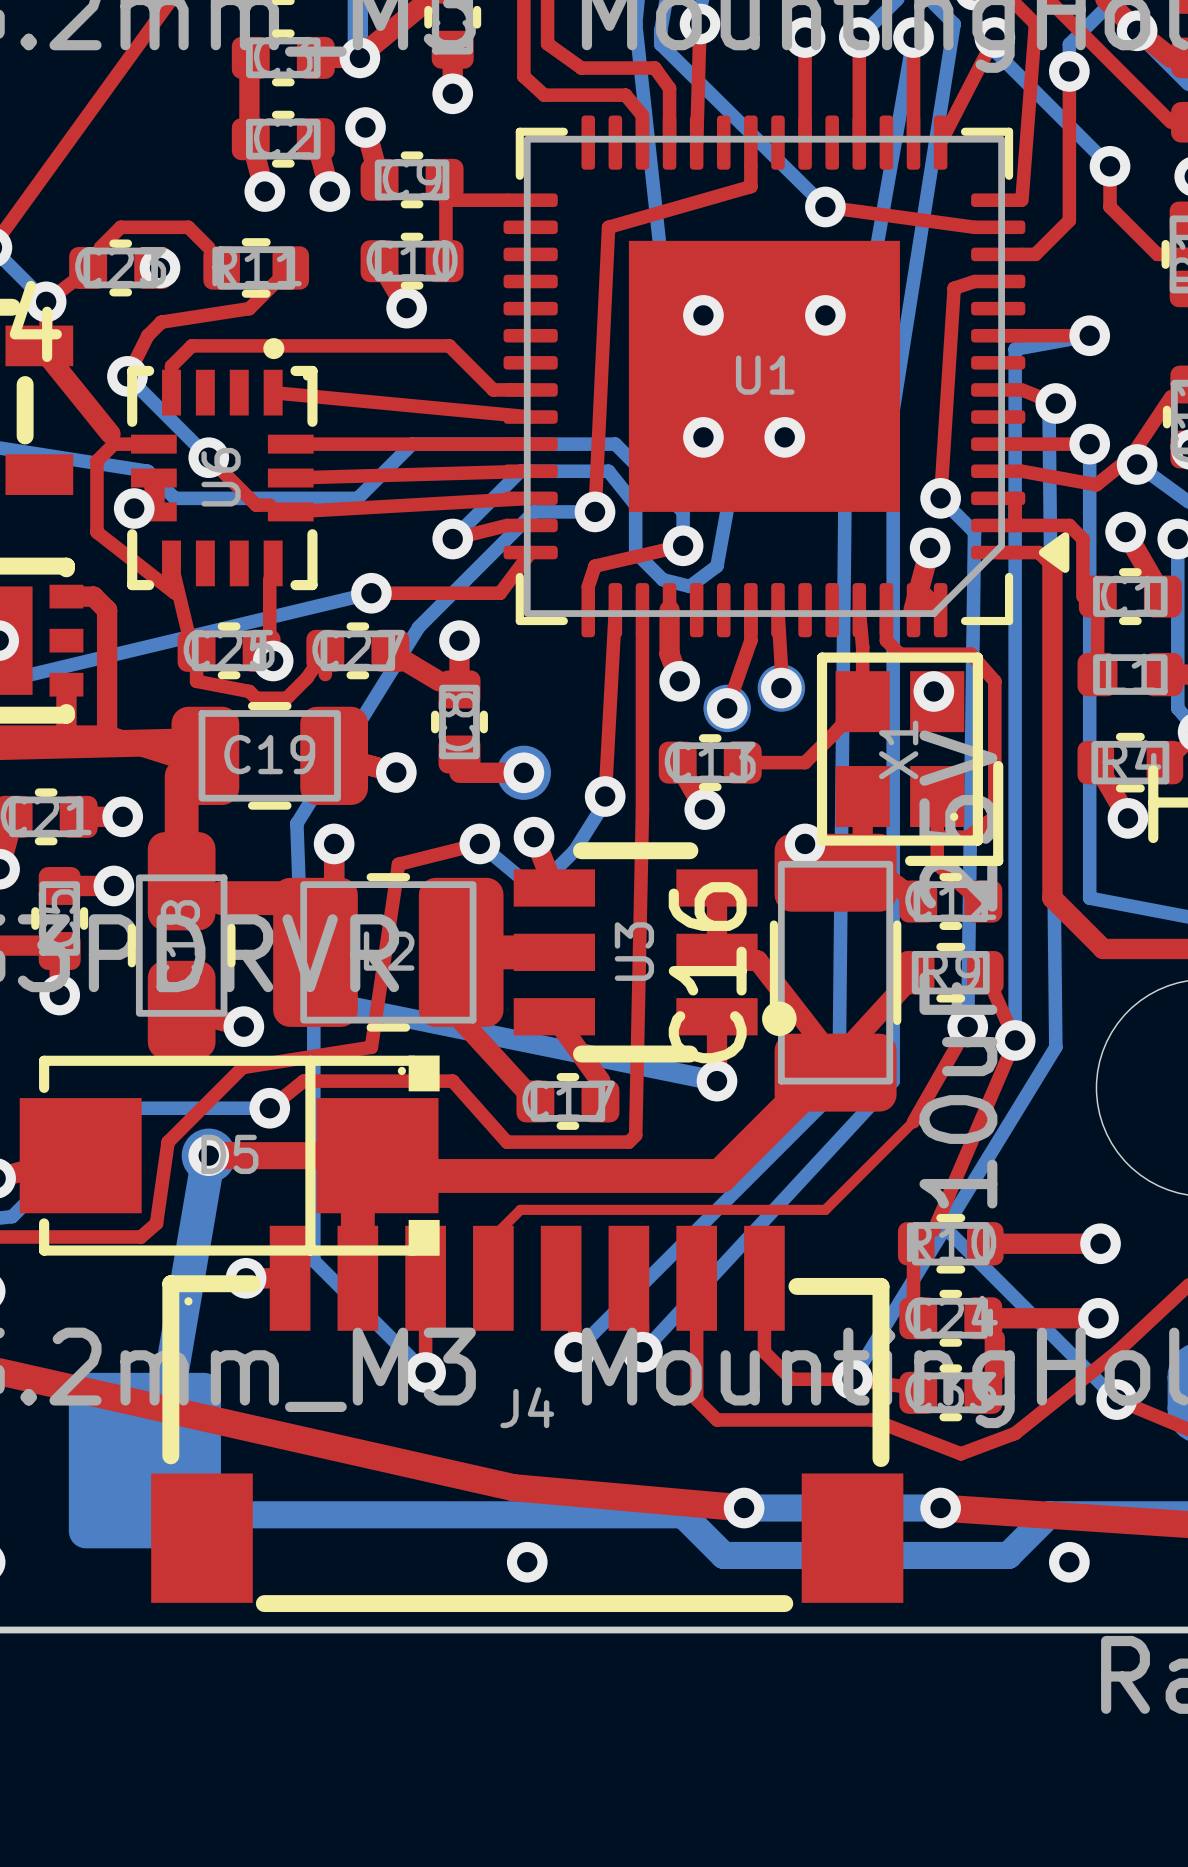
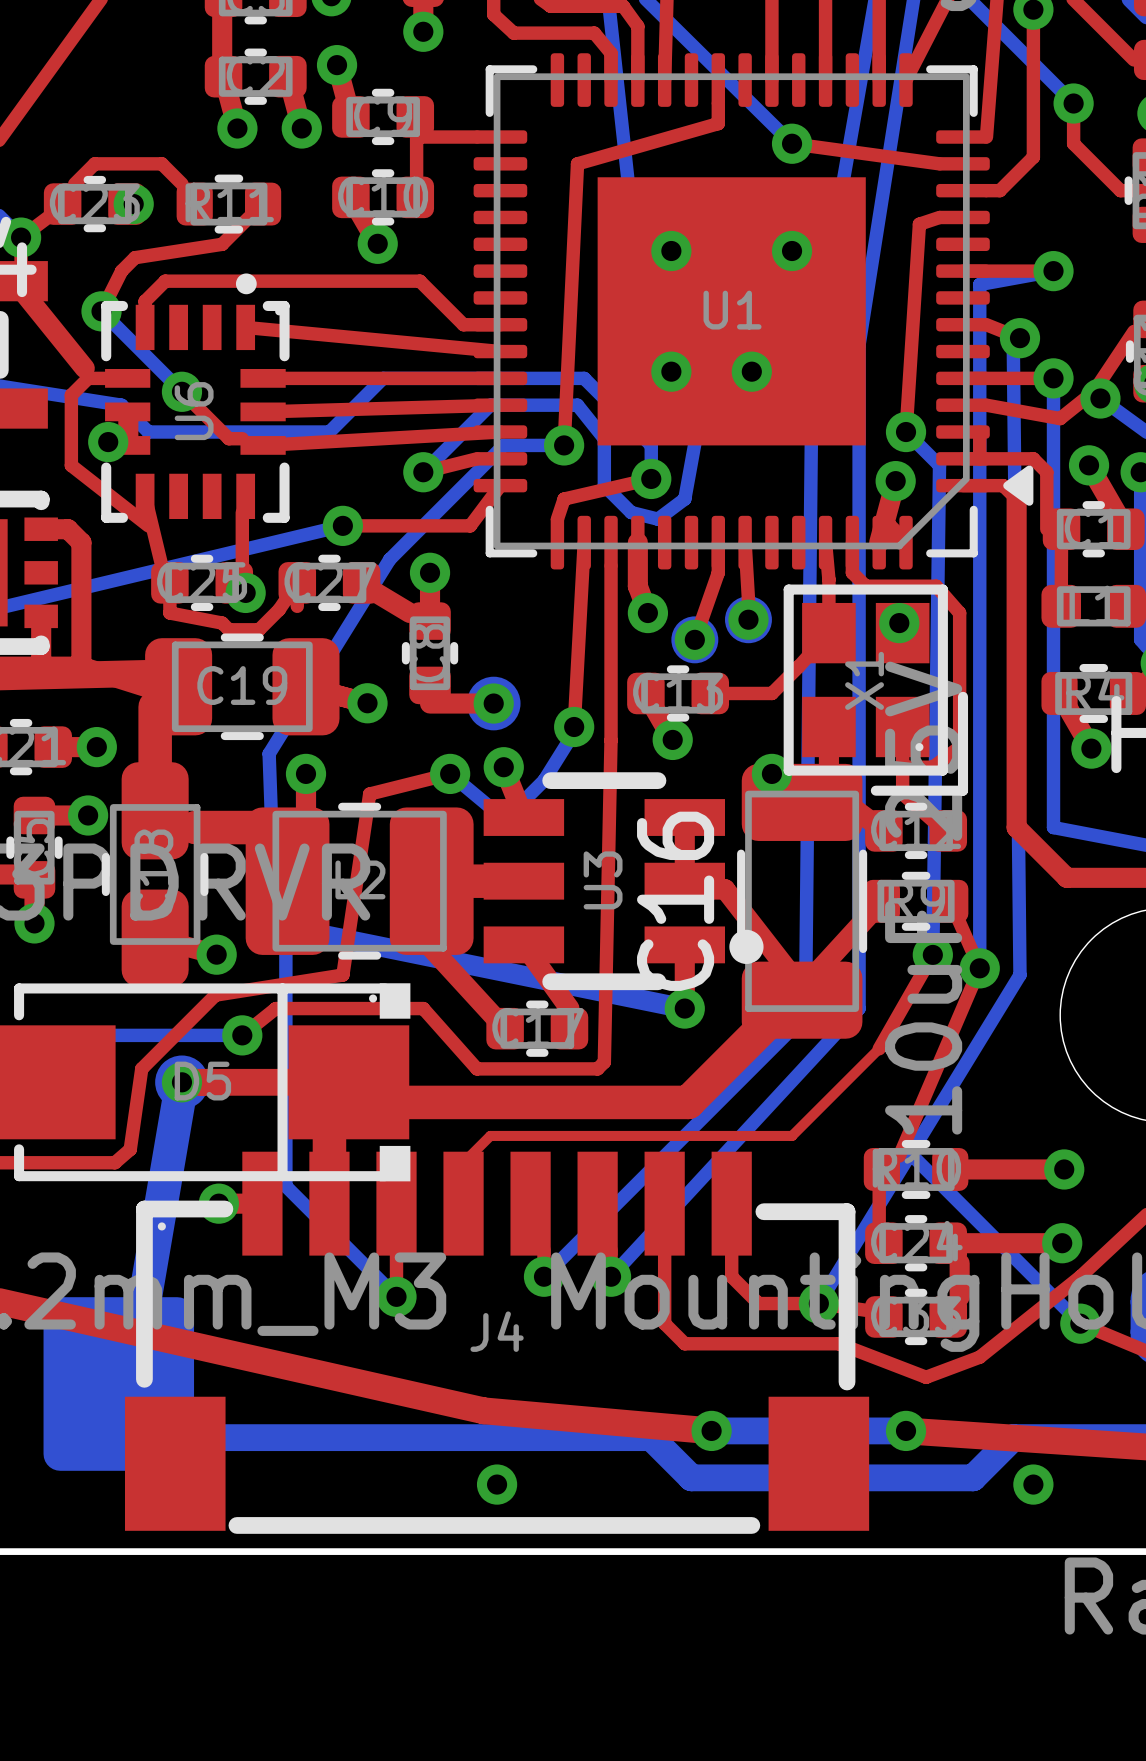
J4 footprint: [151, 1225, 904, 1613] -> [124, 1151, 870, 1534]

